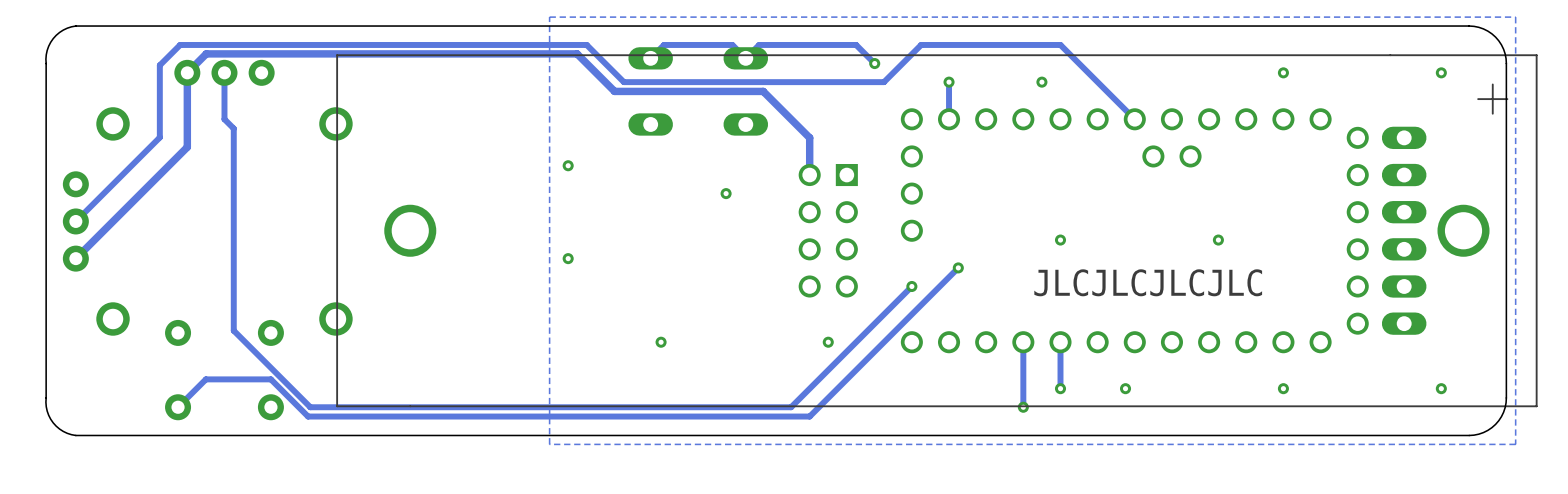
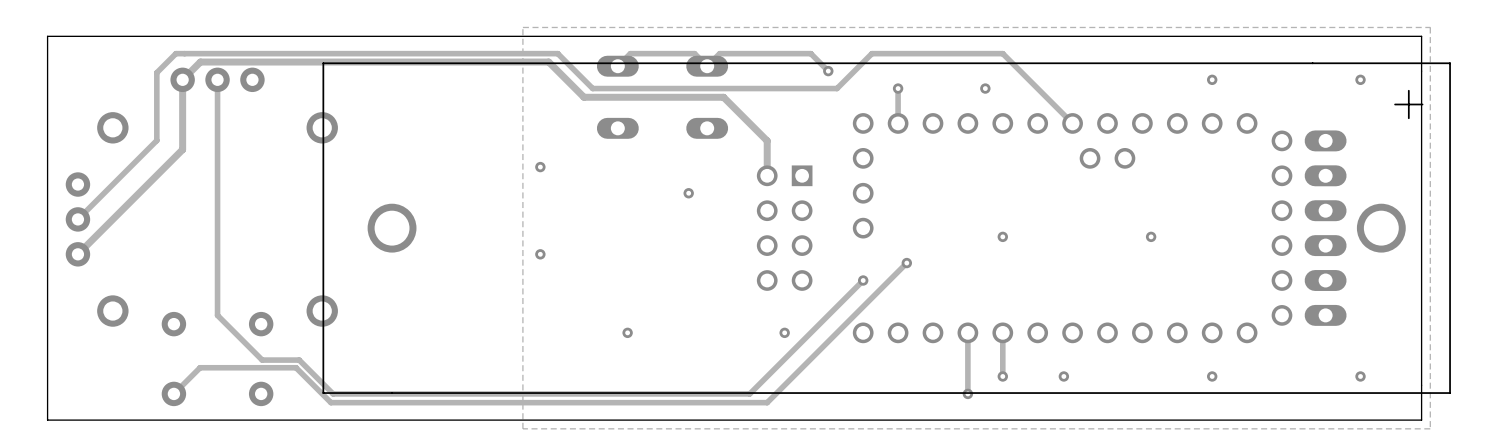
board edge: (1506, 63) (1503, 49) (1495, 37) (1483, 28) (1469, 26) (75, 26) (63, 30) (53, 38) (47, 50) (45, 59) (45, 402) (47, 411) (53, 422) (63, 431) (71, 434) (1469, 435) (1483, 432) (1495, 424) (1503, 412) (1506, 397) -> (1421, 71) (1421, 36) (47, 36) (47, 420) (1421, 420) (1421, 385)
track: (224, 119) (233, 128) (233, 330) (310, 407) (347, 407) -> (217, 123) (217, 315) (262, 360) (299, 360) (333, 393)
text: JLCJLCJLCJLC (1148, 282) -> none
track: (270, 379) (308, 416) (345, 416) -> (261, 367) (296, 367) (330, 402)

